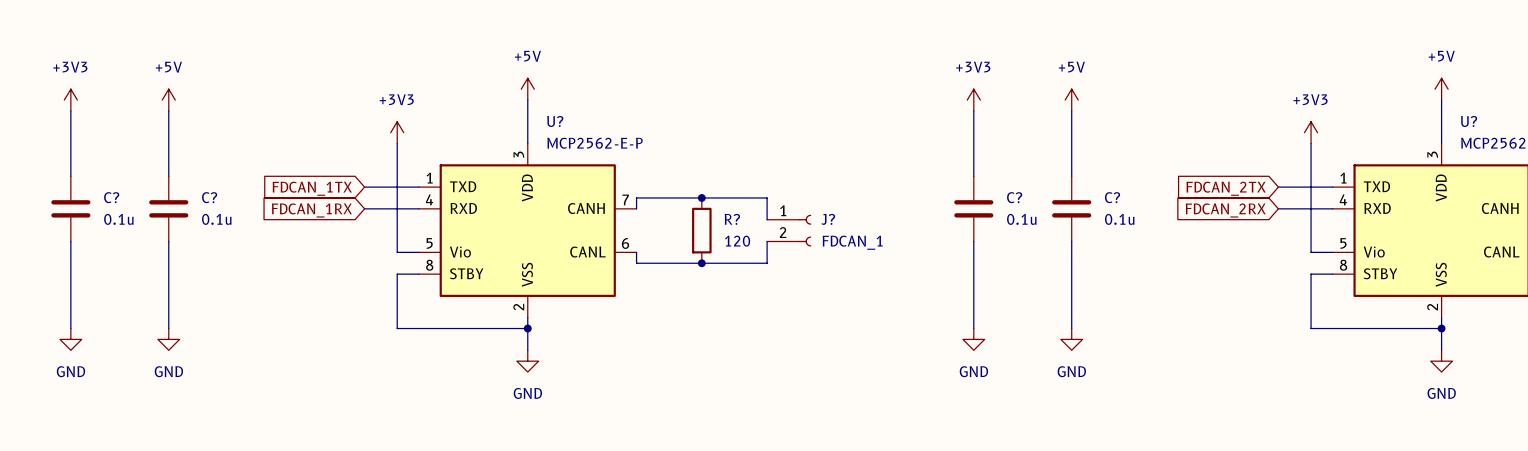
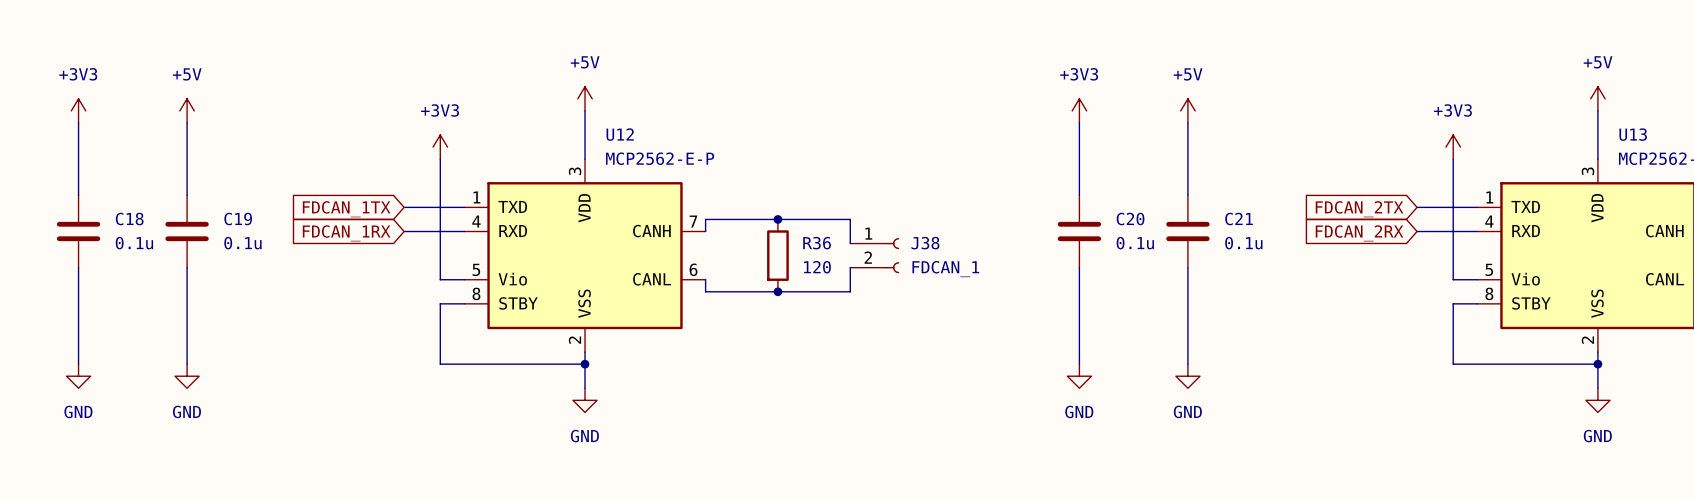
U? name: U? (555, 121) -> U12 (620, 134)
U? name: U? (1469, 121) -> U13 (1633, 134)
C? name: C? (111, 197) -> C18 (129, 219)
C? name: C? (209, 197) -> C19 (238, 219)
C? name: C? (1014, 197) -> C20 (1130, 219)
C? name: C? (1112, 197) -> C21 (1239, 219)
R? name: R? (732, 219) -> R36 (817, 243)
J? name: J? (828, 219) -> J38 (925, 243)

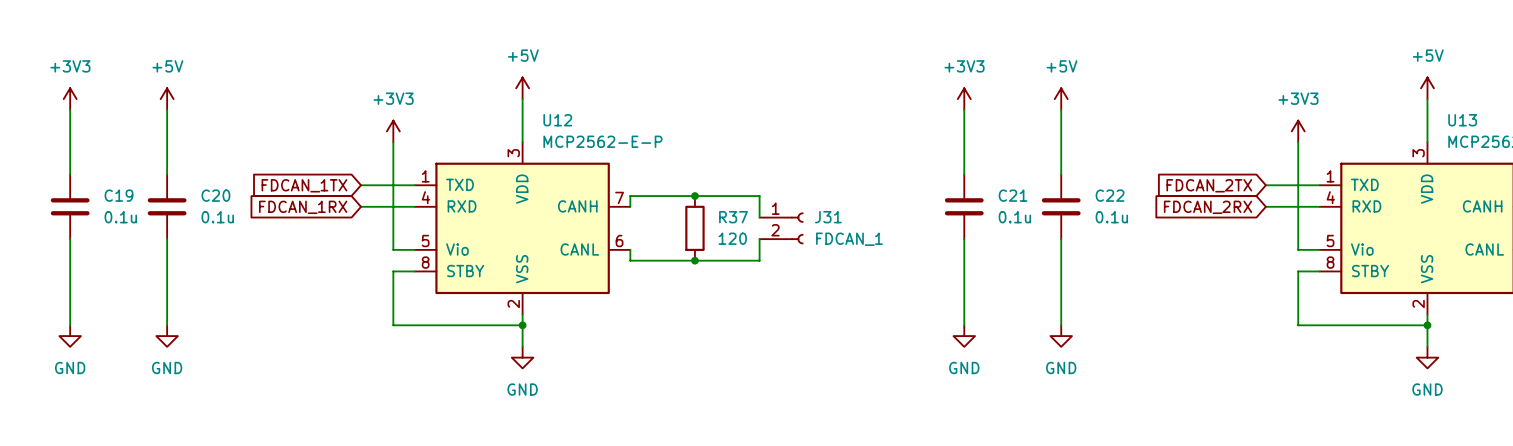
C18 name: C18 (129, 219) -> C19 (118, 195)
C19 name: C19 (238, 219) -> C20 (215, 195)
C20 name: C20 (1130, 219) -> C21 (1013, 195)
C21 name: C21 (1239, 219) -> C22 (1110, 195)
R36 name: R36 (817, 243) -> R37 (733, 217)
J38 name: J38 (925, 243) -> J31 (828, 217)

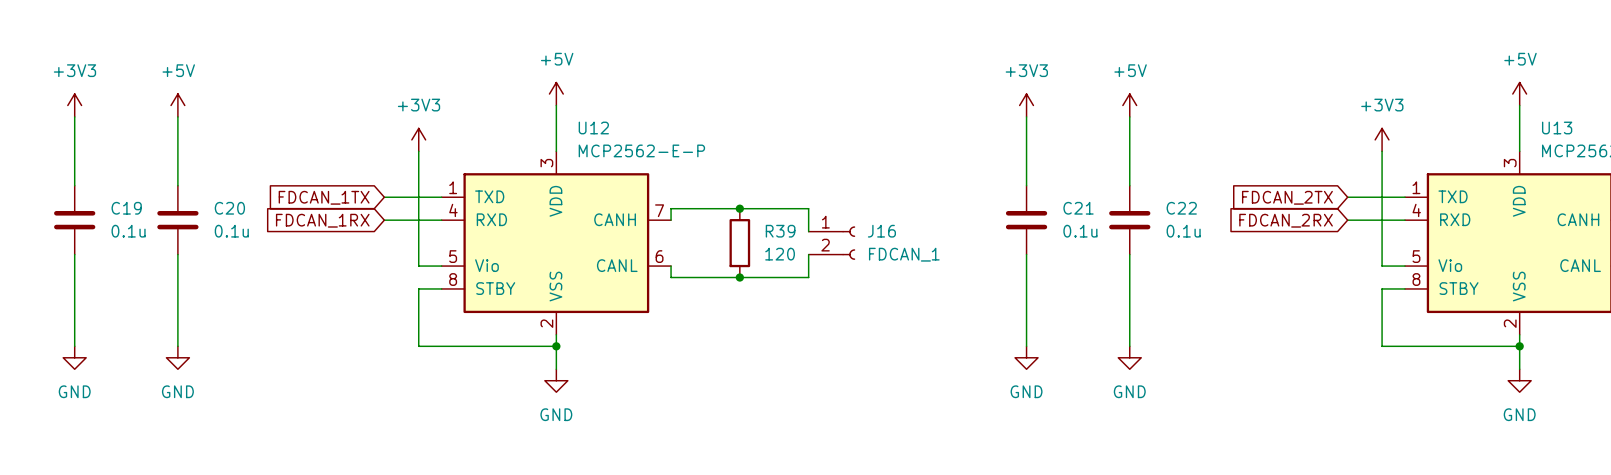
R37 name: R37 (733, 217) -> R39 (780, 231)
J31 name: J31 (828, 217) -> J16 (881, 231)

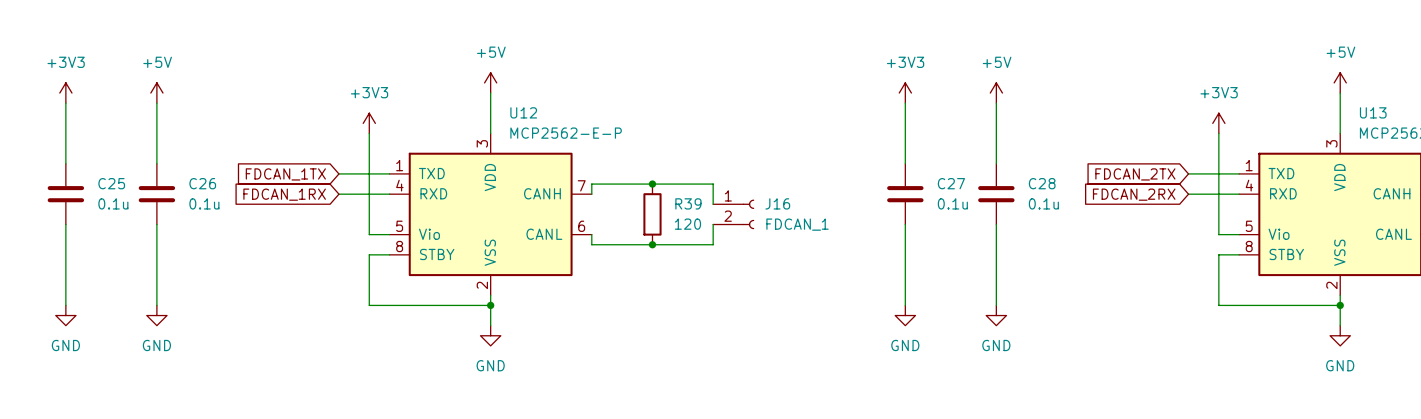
C19 name: C19 (126, 208) -> C25 (111, 183)
C20 name: C20 (229, 208) -> C26 (202, 183)
C21 name: C21 (1078, 208) -> C27 (951, 183)
C22 name: C22 (1181, 208) -> C28 (1042, 183)

